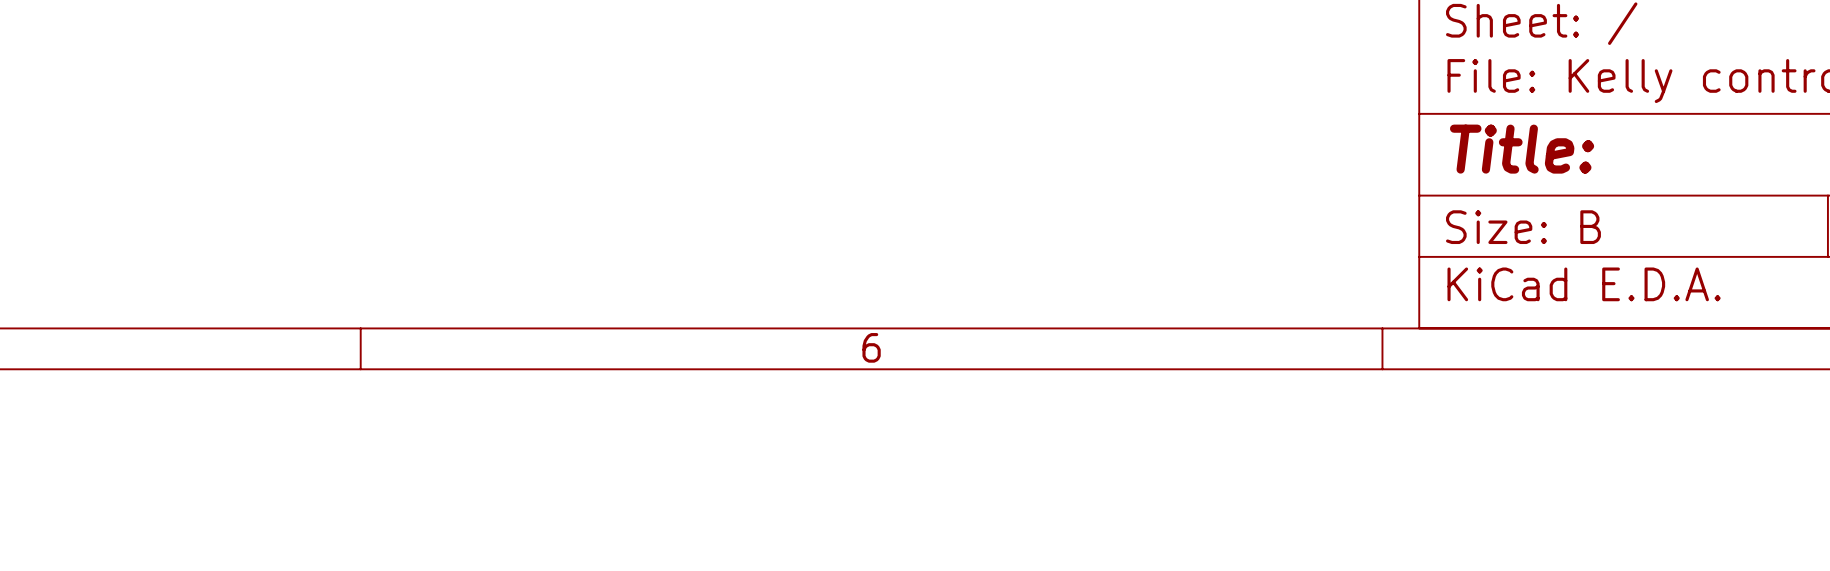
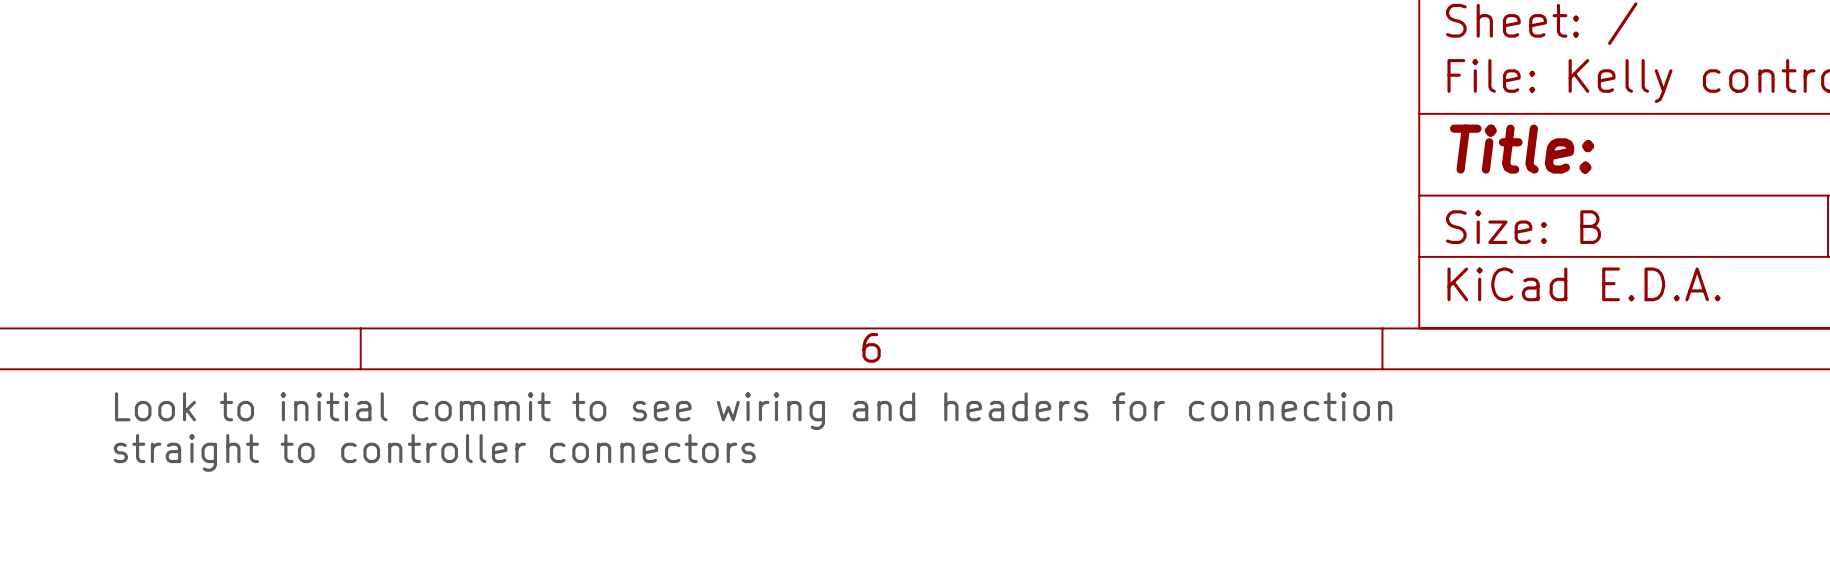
text: none -> Look to initial commit to see wiring and headers for connection (753, 411)
text: none -> straight to controller connectors (434, 452)

